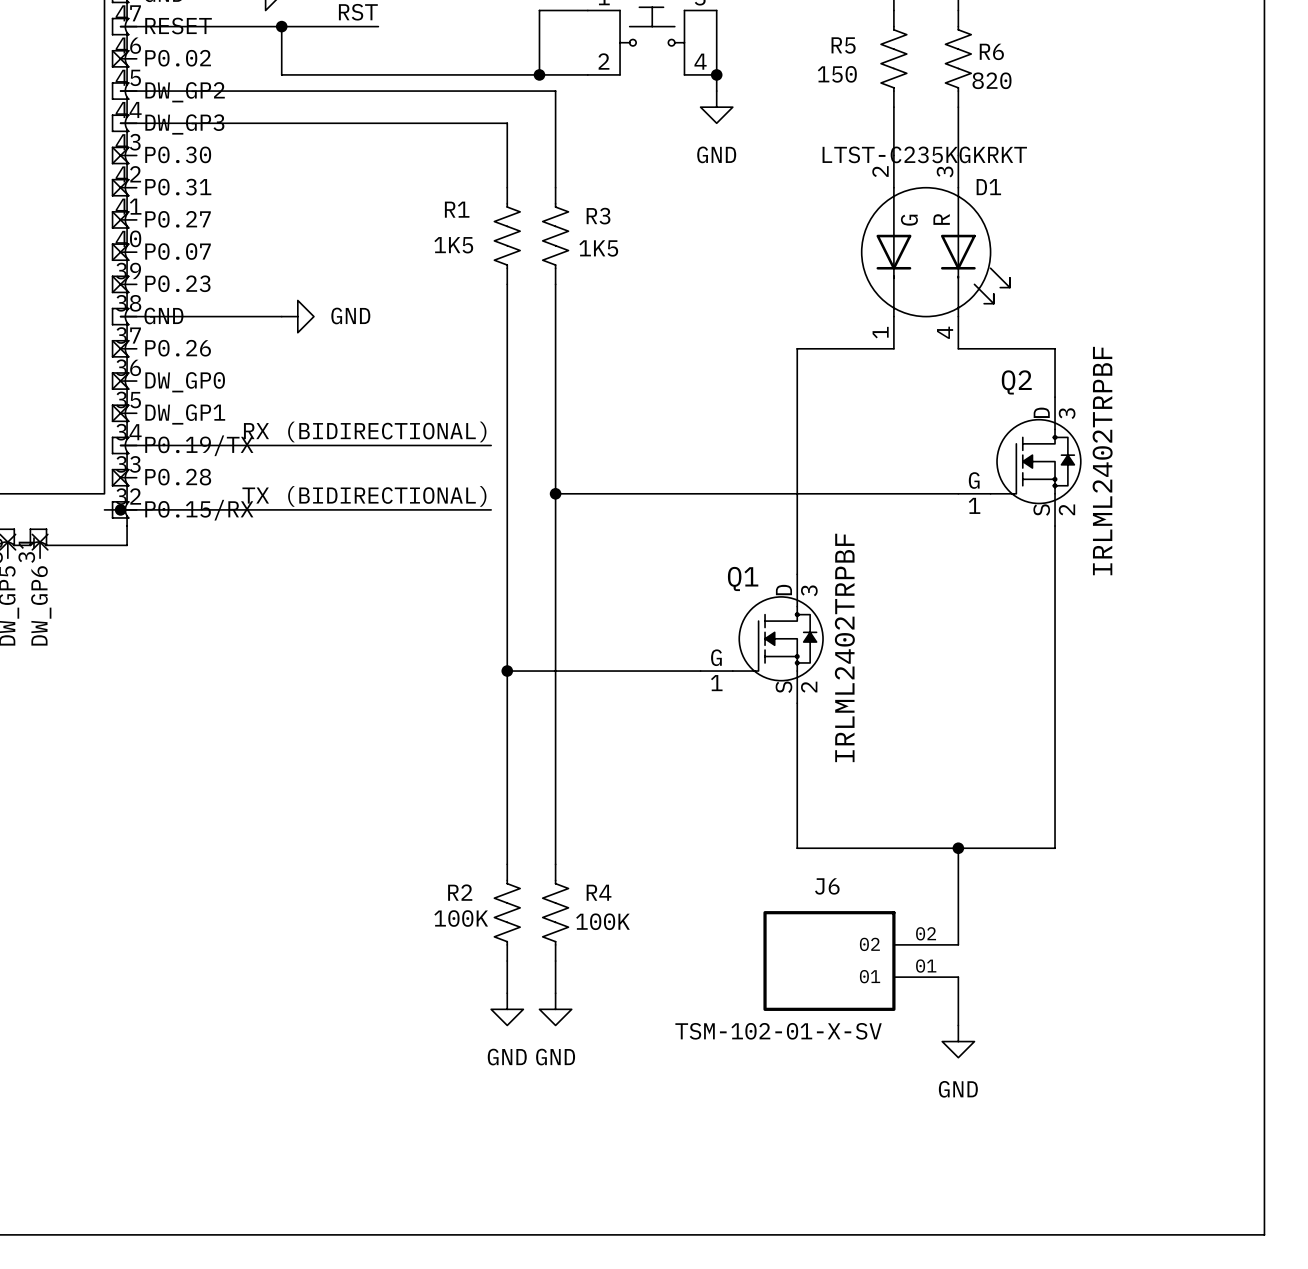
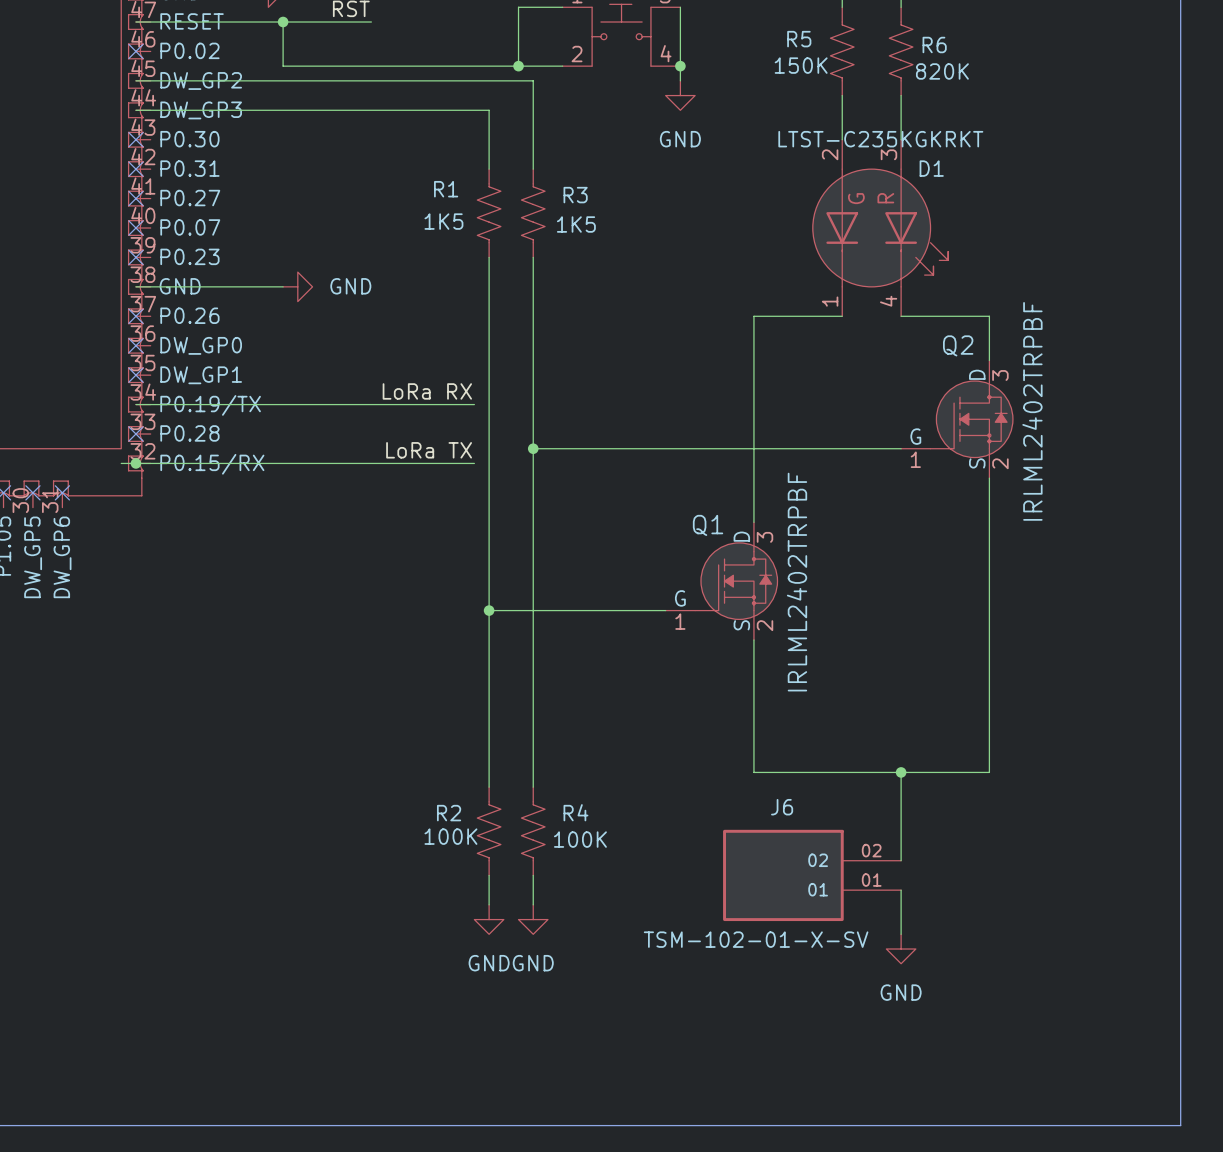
R5 value: 150 (837, 74) -> 150K (801, 65)
R6 value: 820 (992, 80) -> 820K (942, 71)
label: RX (BIDIRECTIONAL) (365, 431) -> LoRa RX (427, 391)
label: TX (BIDIRECTIONAL) (364, 496) -> LoRa TX (429, 450)

